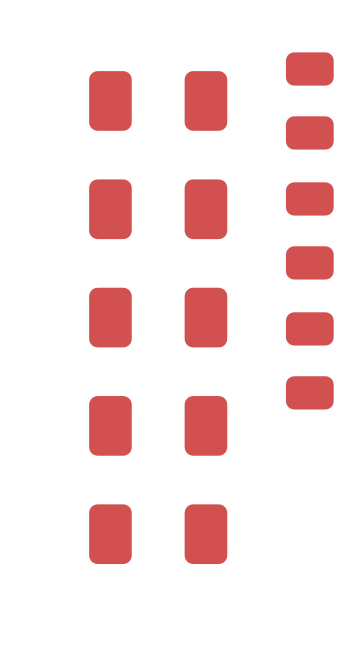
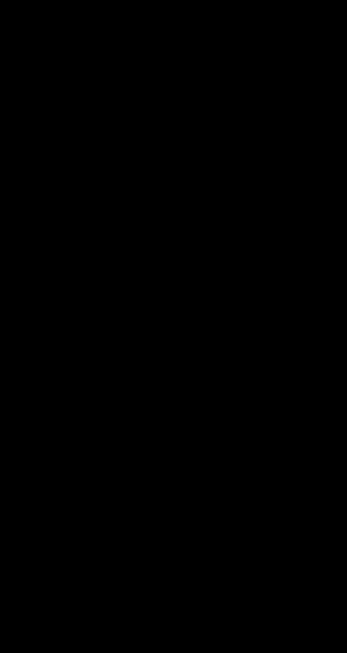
part: (158, 100) -> none
part: (309, 100) -> none
part: (158, 209) -> none
part: (309, 230) -> none
part: (158, 317) -> none
part: (309, 360) -> none
part: (158, 425) -> none
part: (158, 534) -> none

